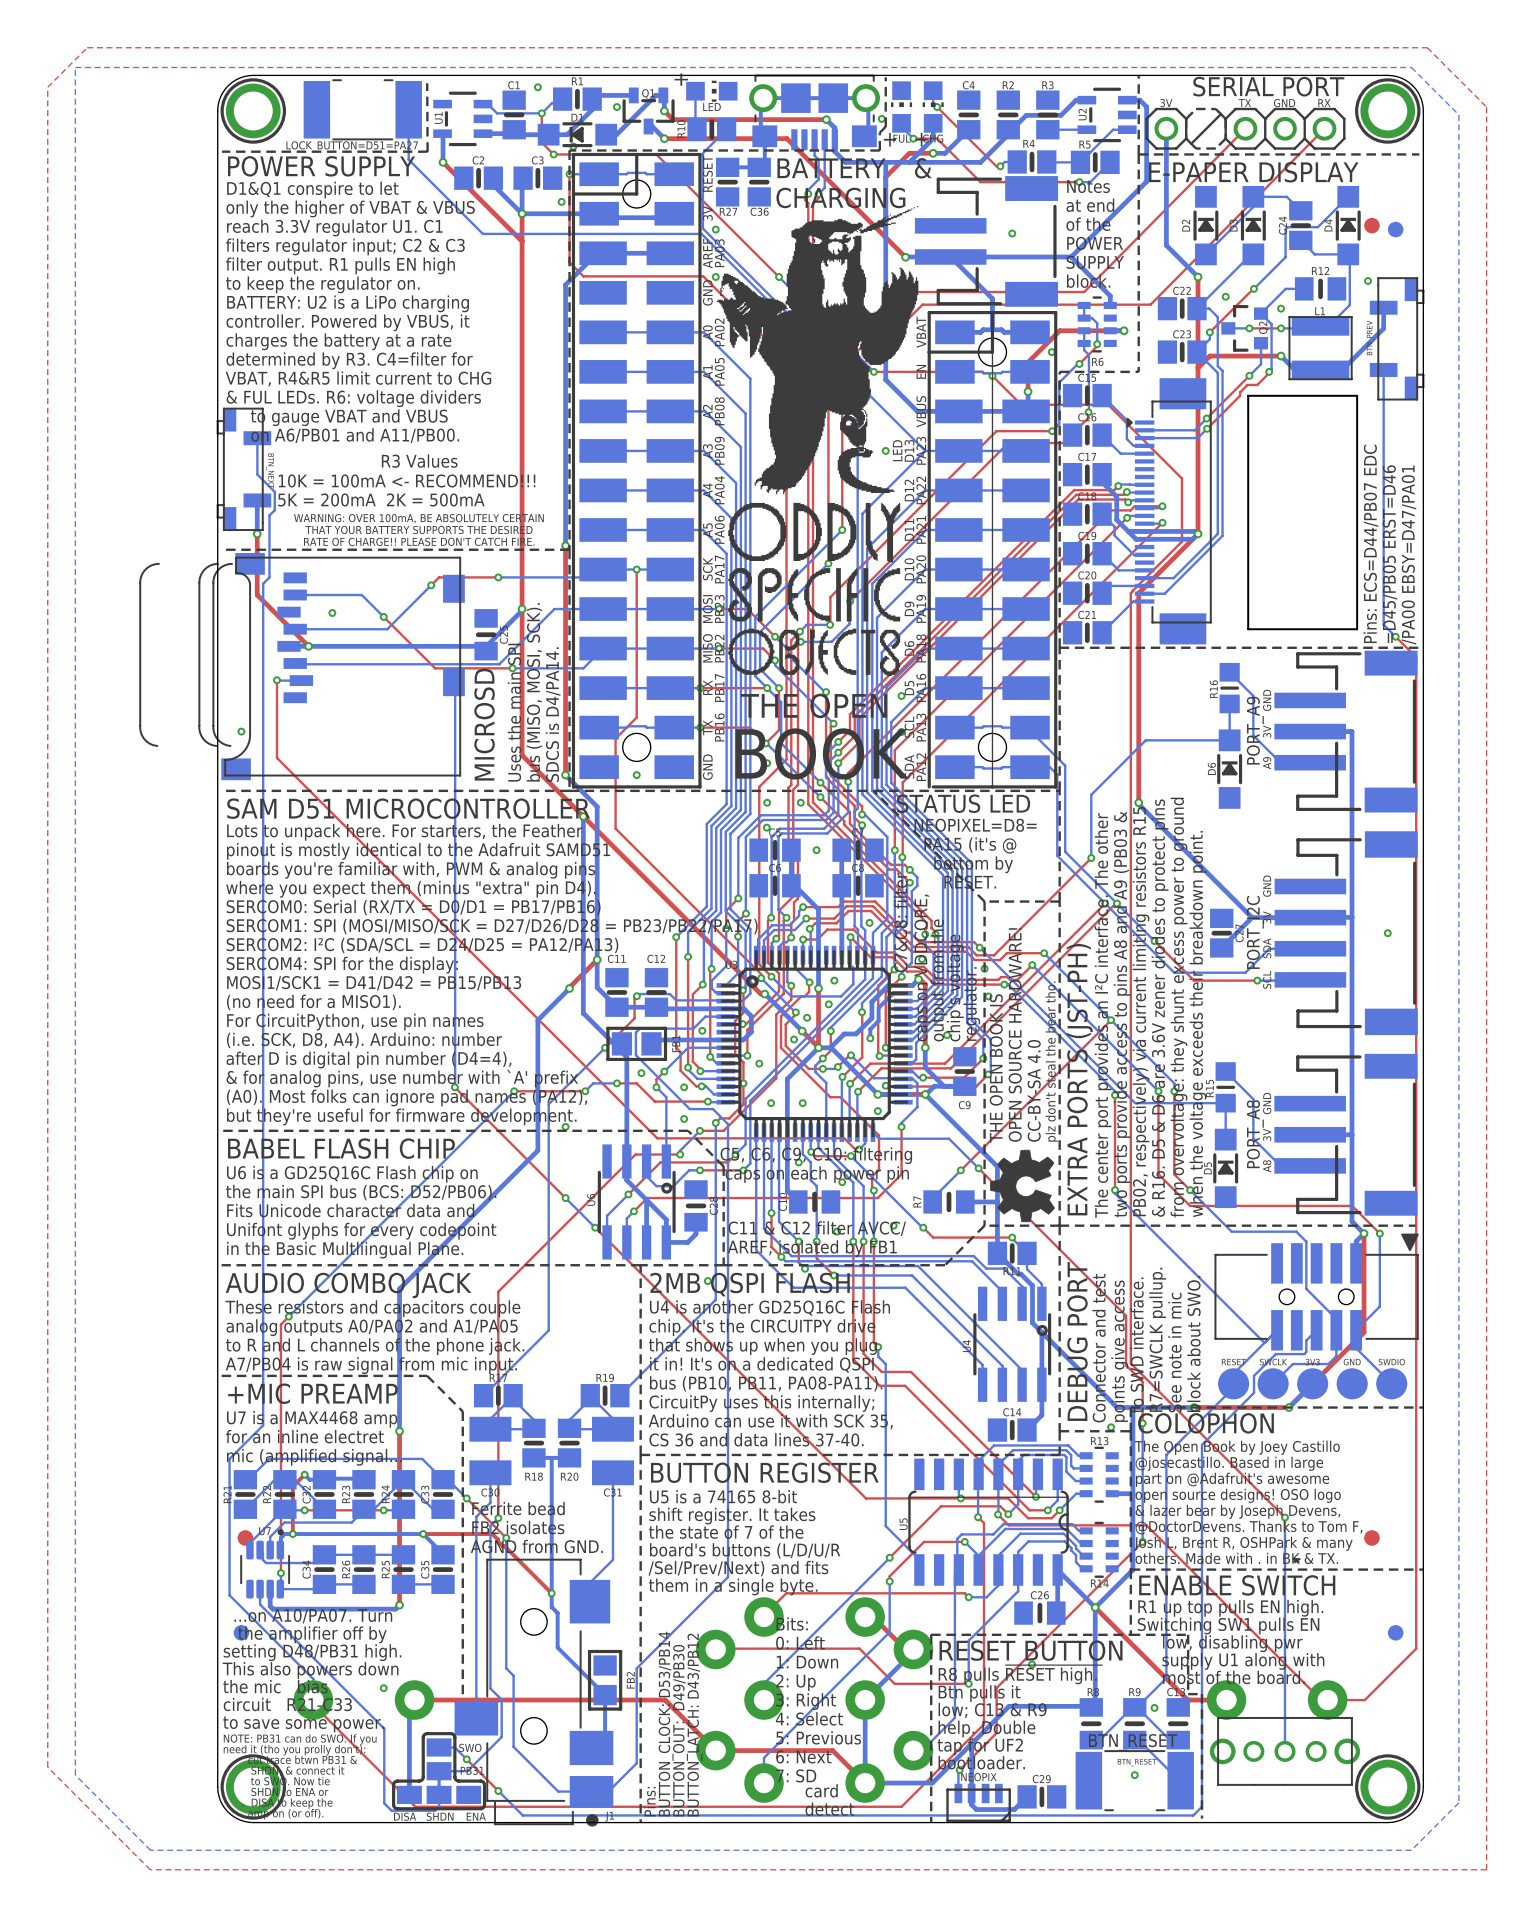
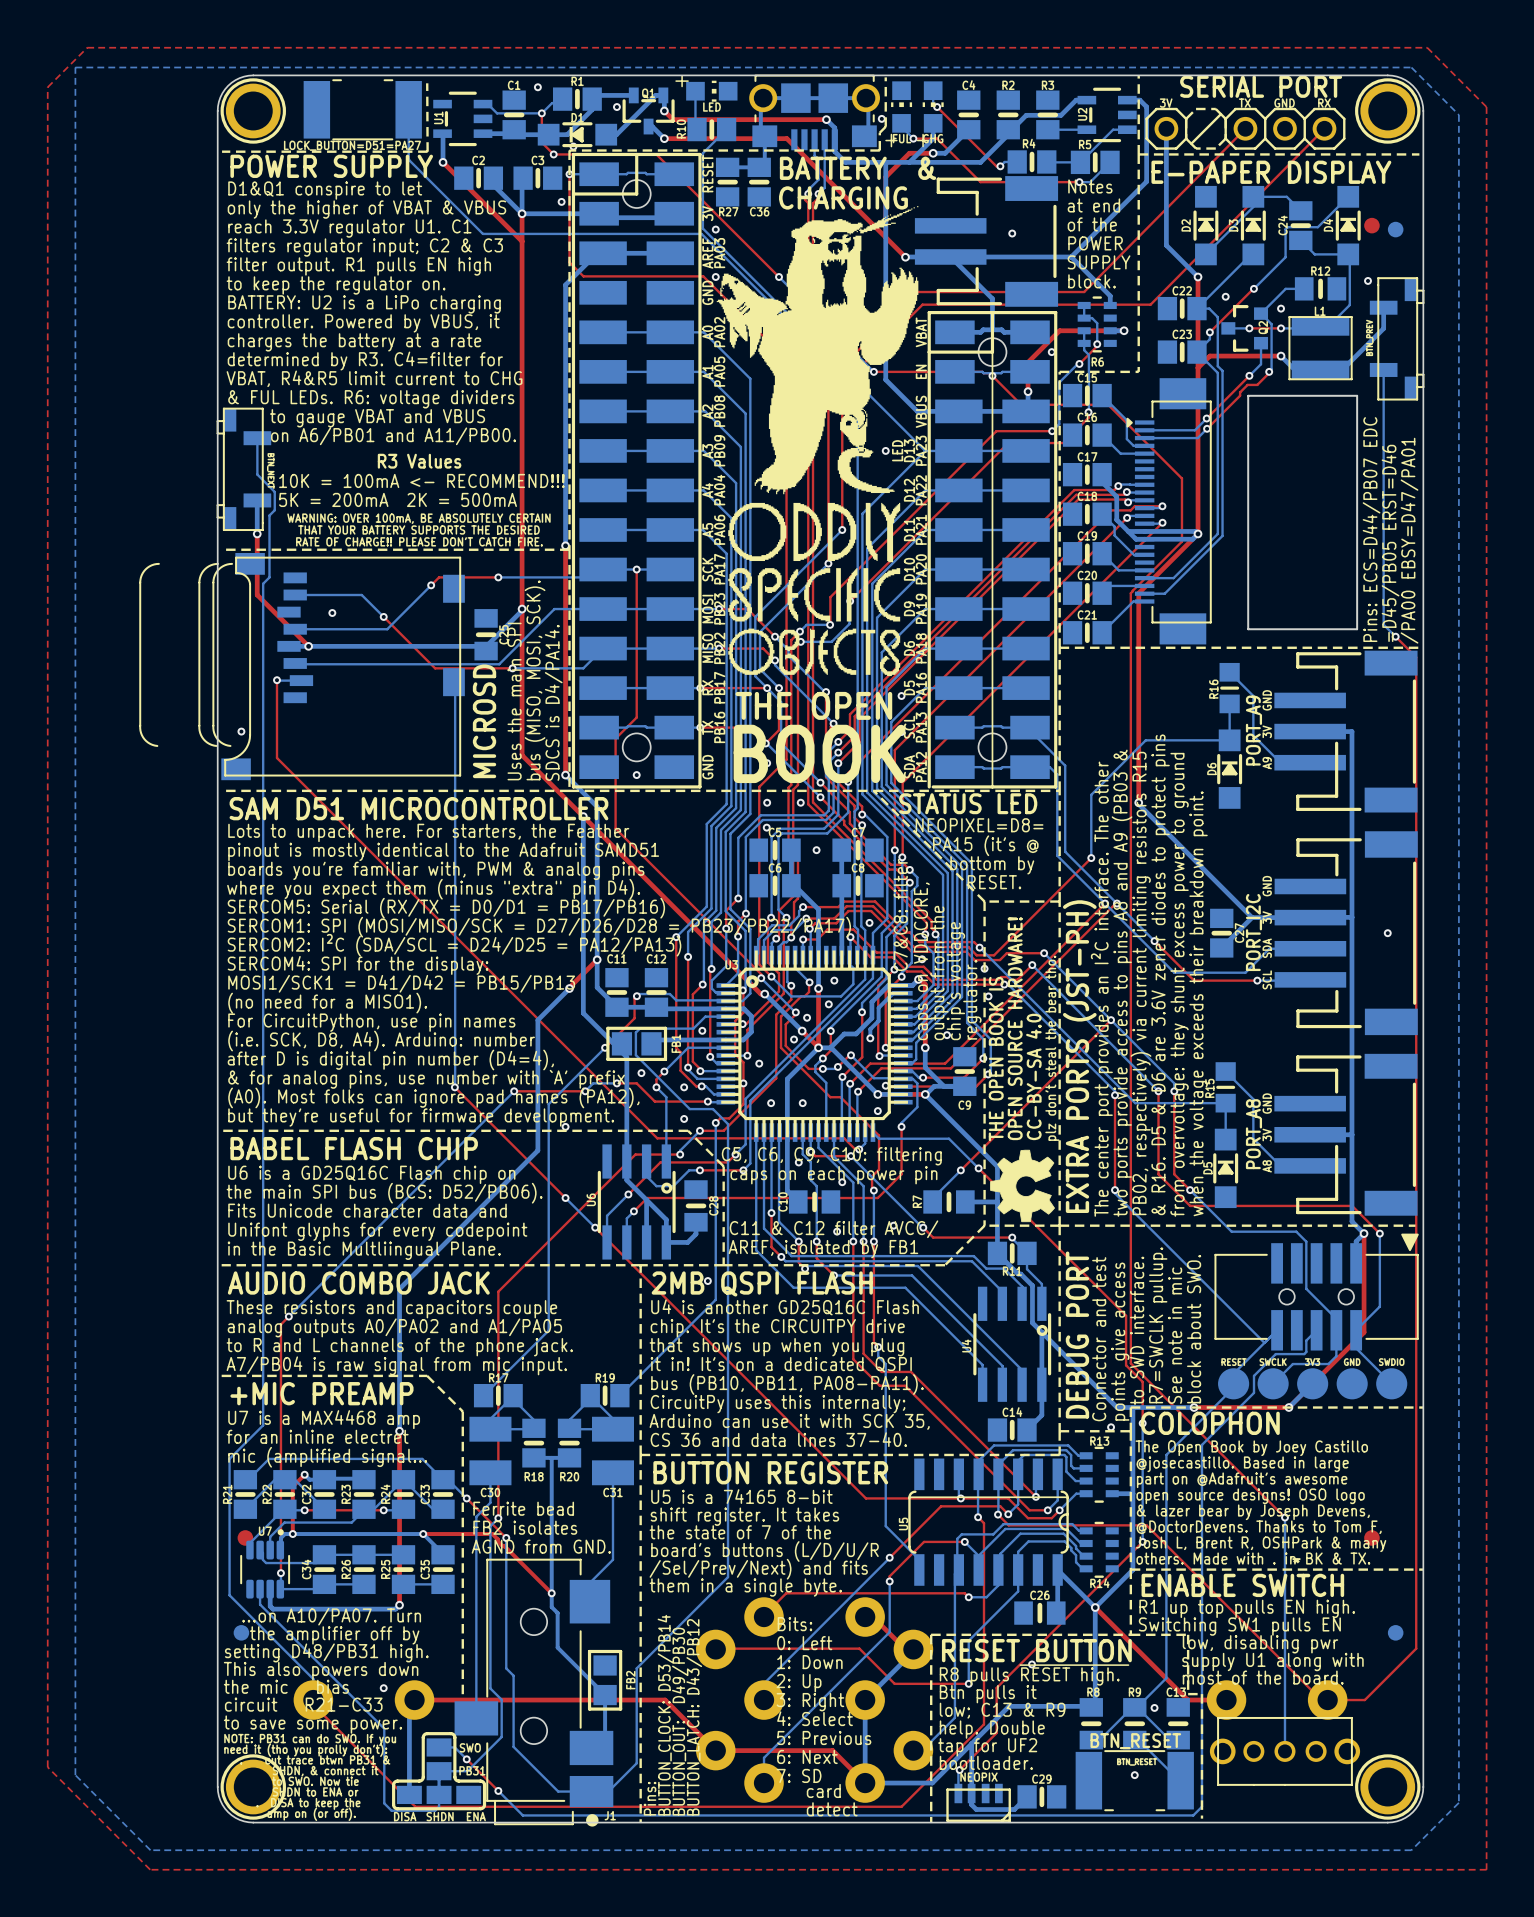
text: SERCOM0: Serial (RX/TX = D0/D1 = PB17/PB16) (413, 907) -> SERCOM5: Serial (RX/TX = D0/D1 = PB17/PB16) (446, 908)

